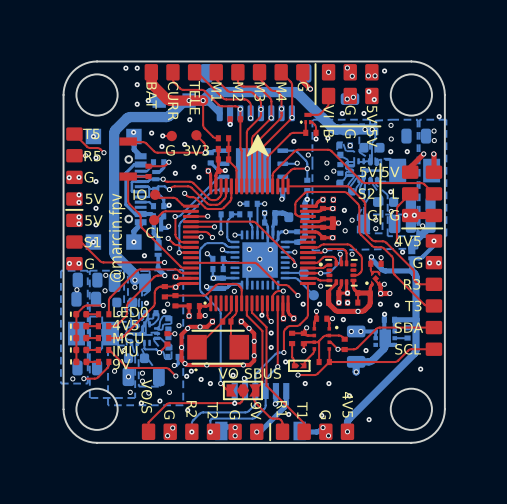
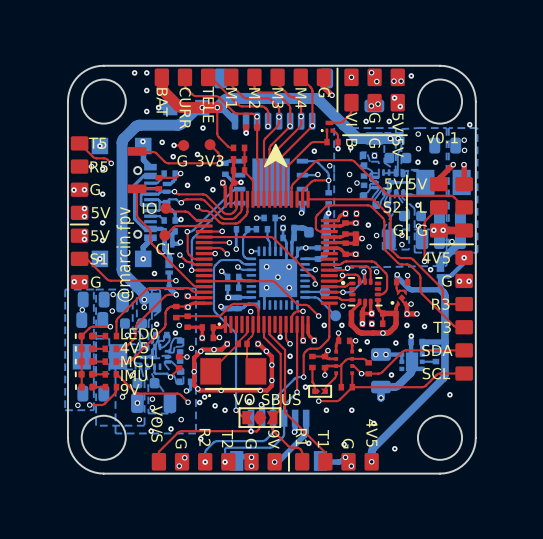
text: none -> v0.1 (442, 137)
via: none -> (342, 275)

